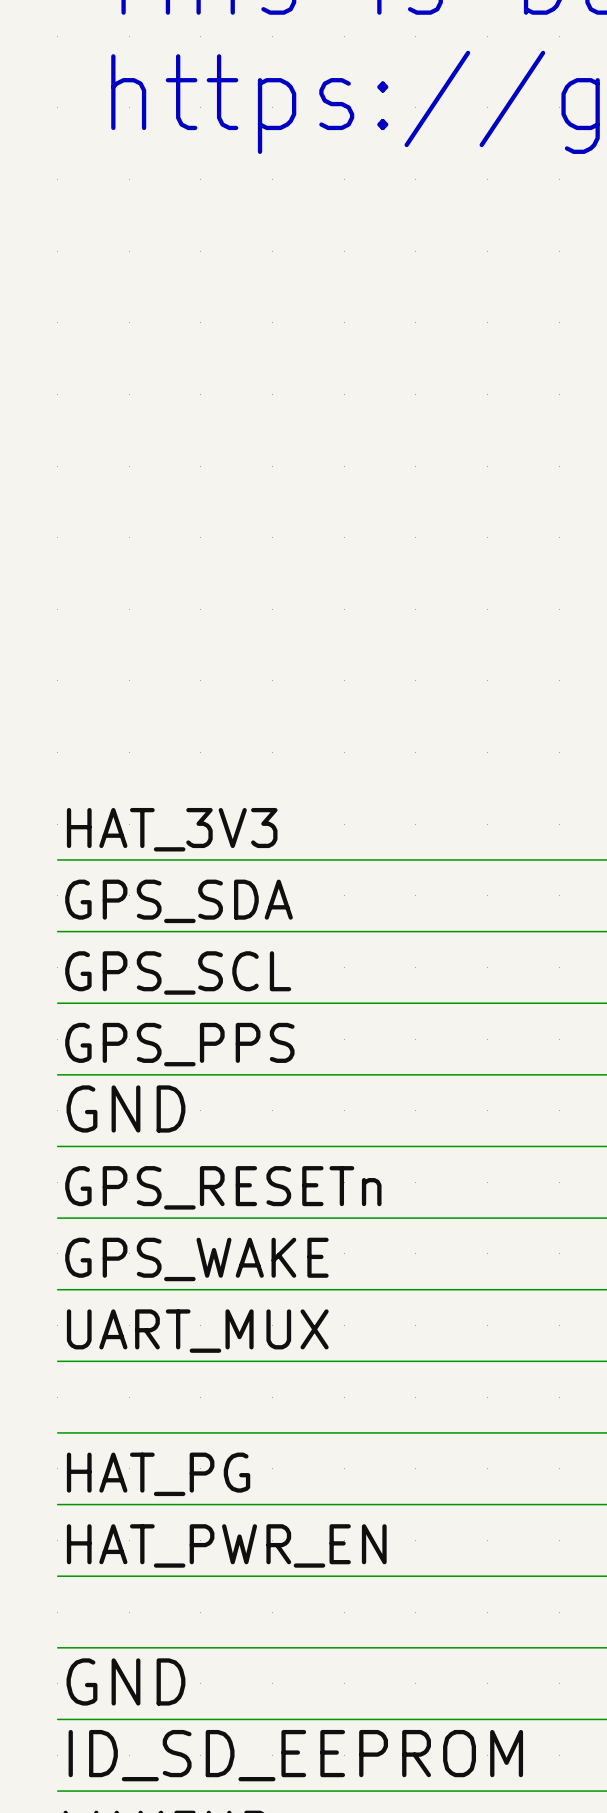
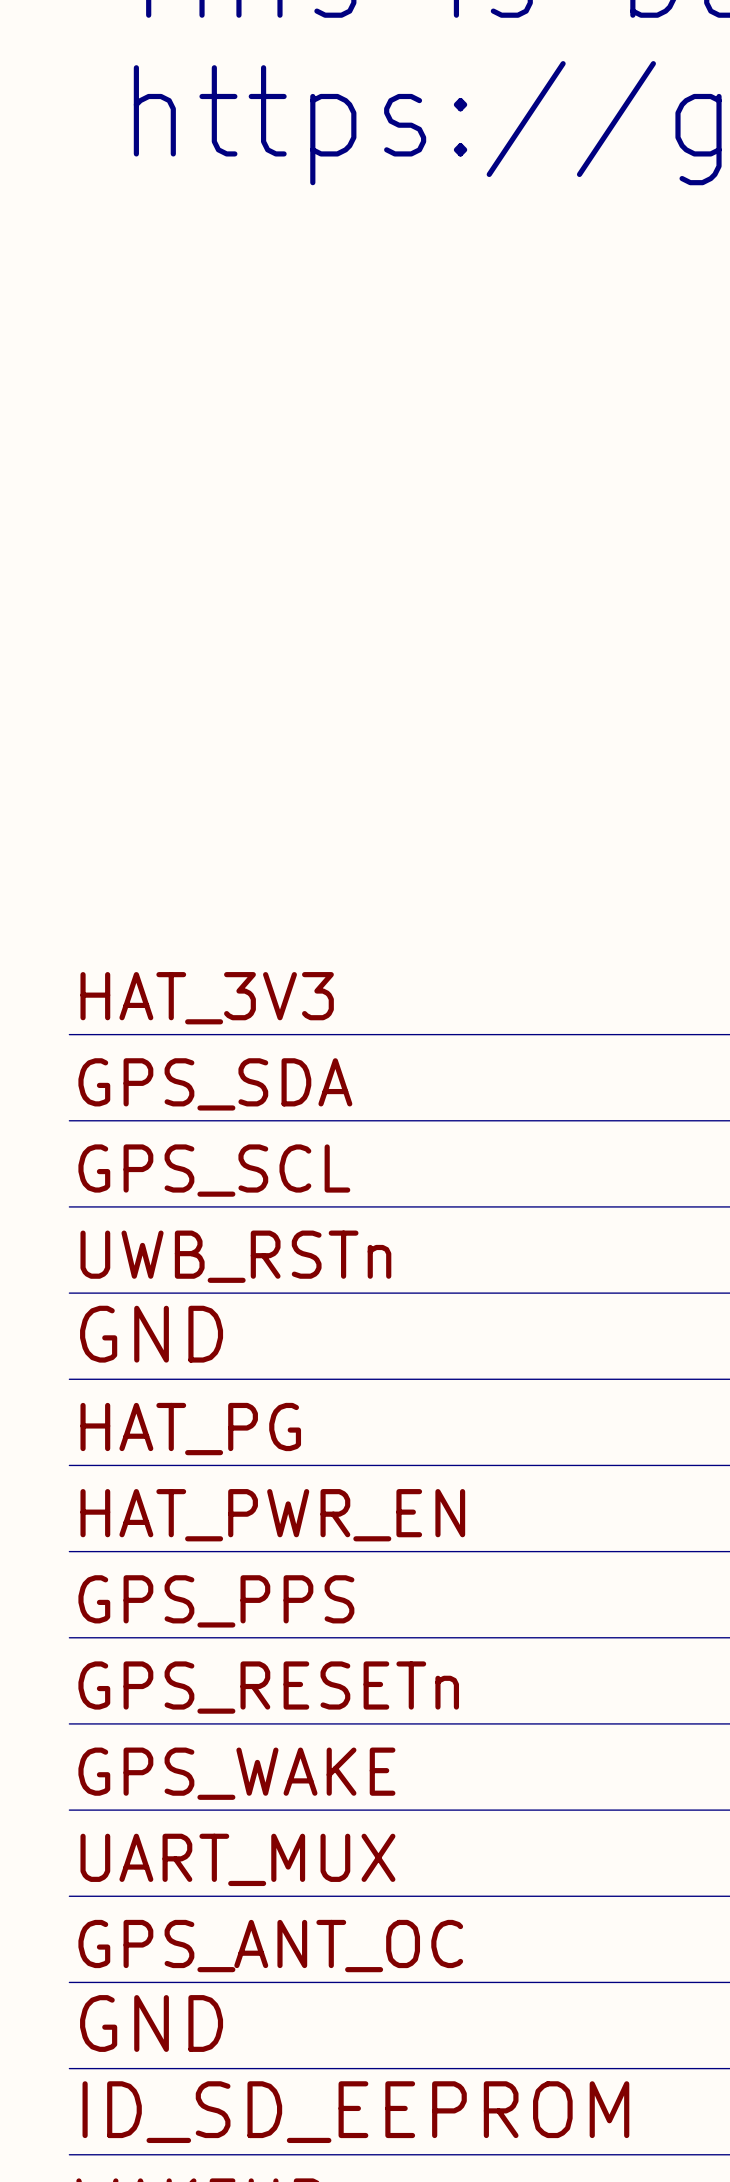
label: GPS_PPS (179, 1044) -> UWB_RSTn (235, 1256)
label: GPS_RESETn (223, 1187) -> HAT_PG (190, 1429)
label: GPS_WAKE (196, 1259) -> HAT_PWR_EN (272, 1515)
label: UART_MUX (197, 1331) -> GPS_PPS (216, 1601)
label: none -> GPS_RESETn (268, 1687)
label: HAT_PG (158, 1474) -> GPS_WAKE (236, 1773)
label: HAT_PWR_EN (226, 1545) -> UART_MUX (237, 1859)
label: none -> GPS_ANT_OC (270, 1946)

